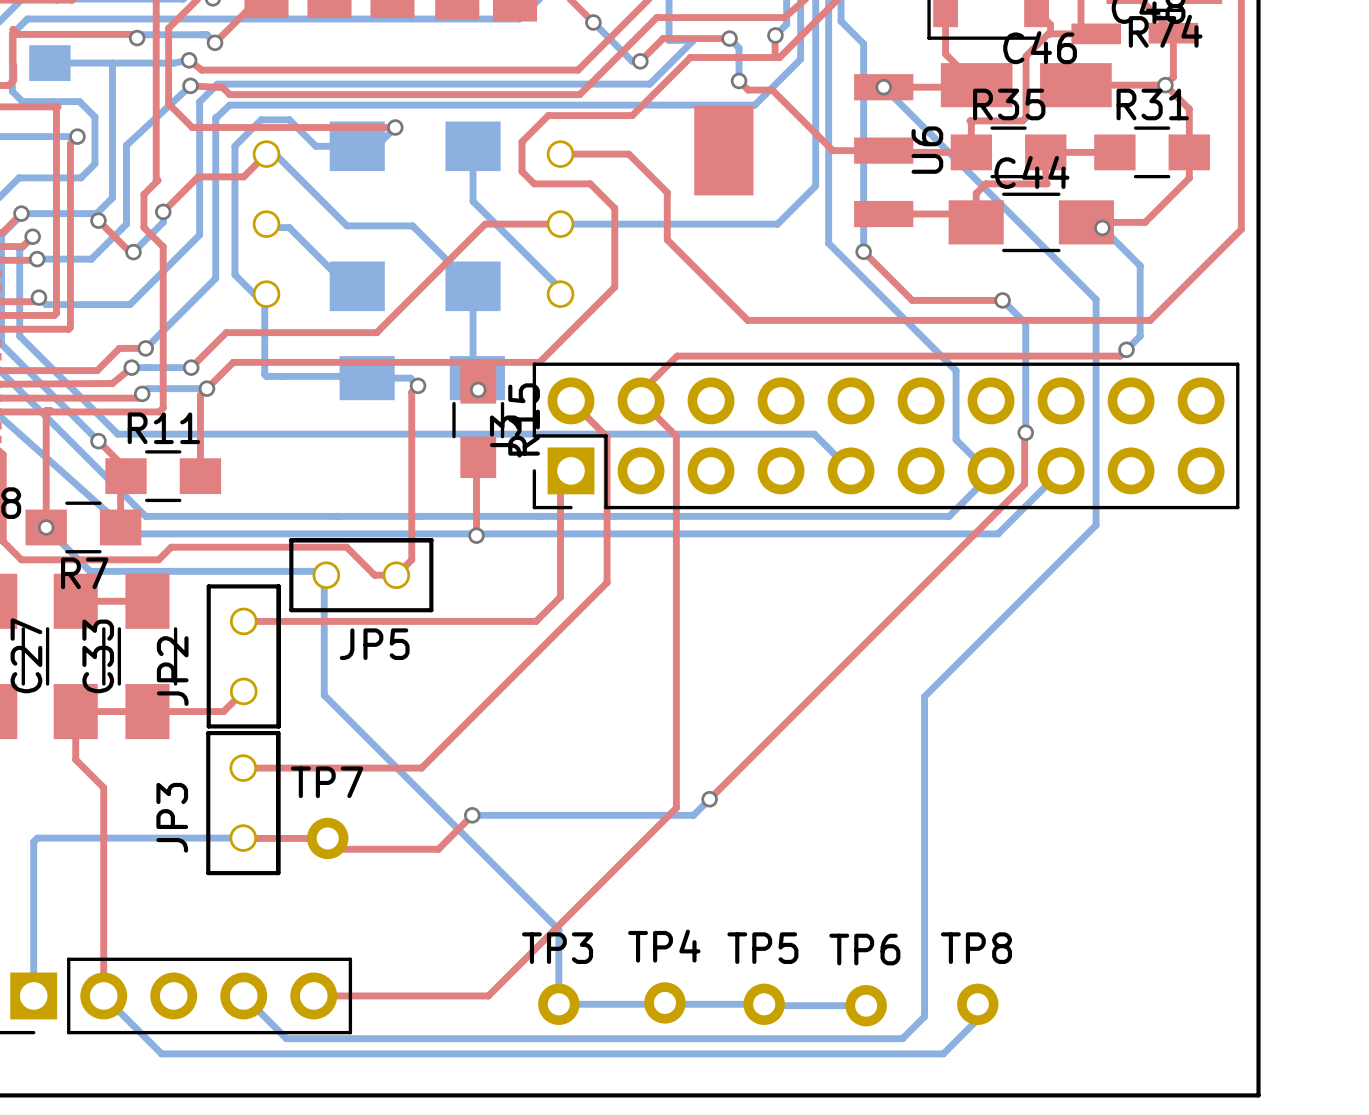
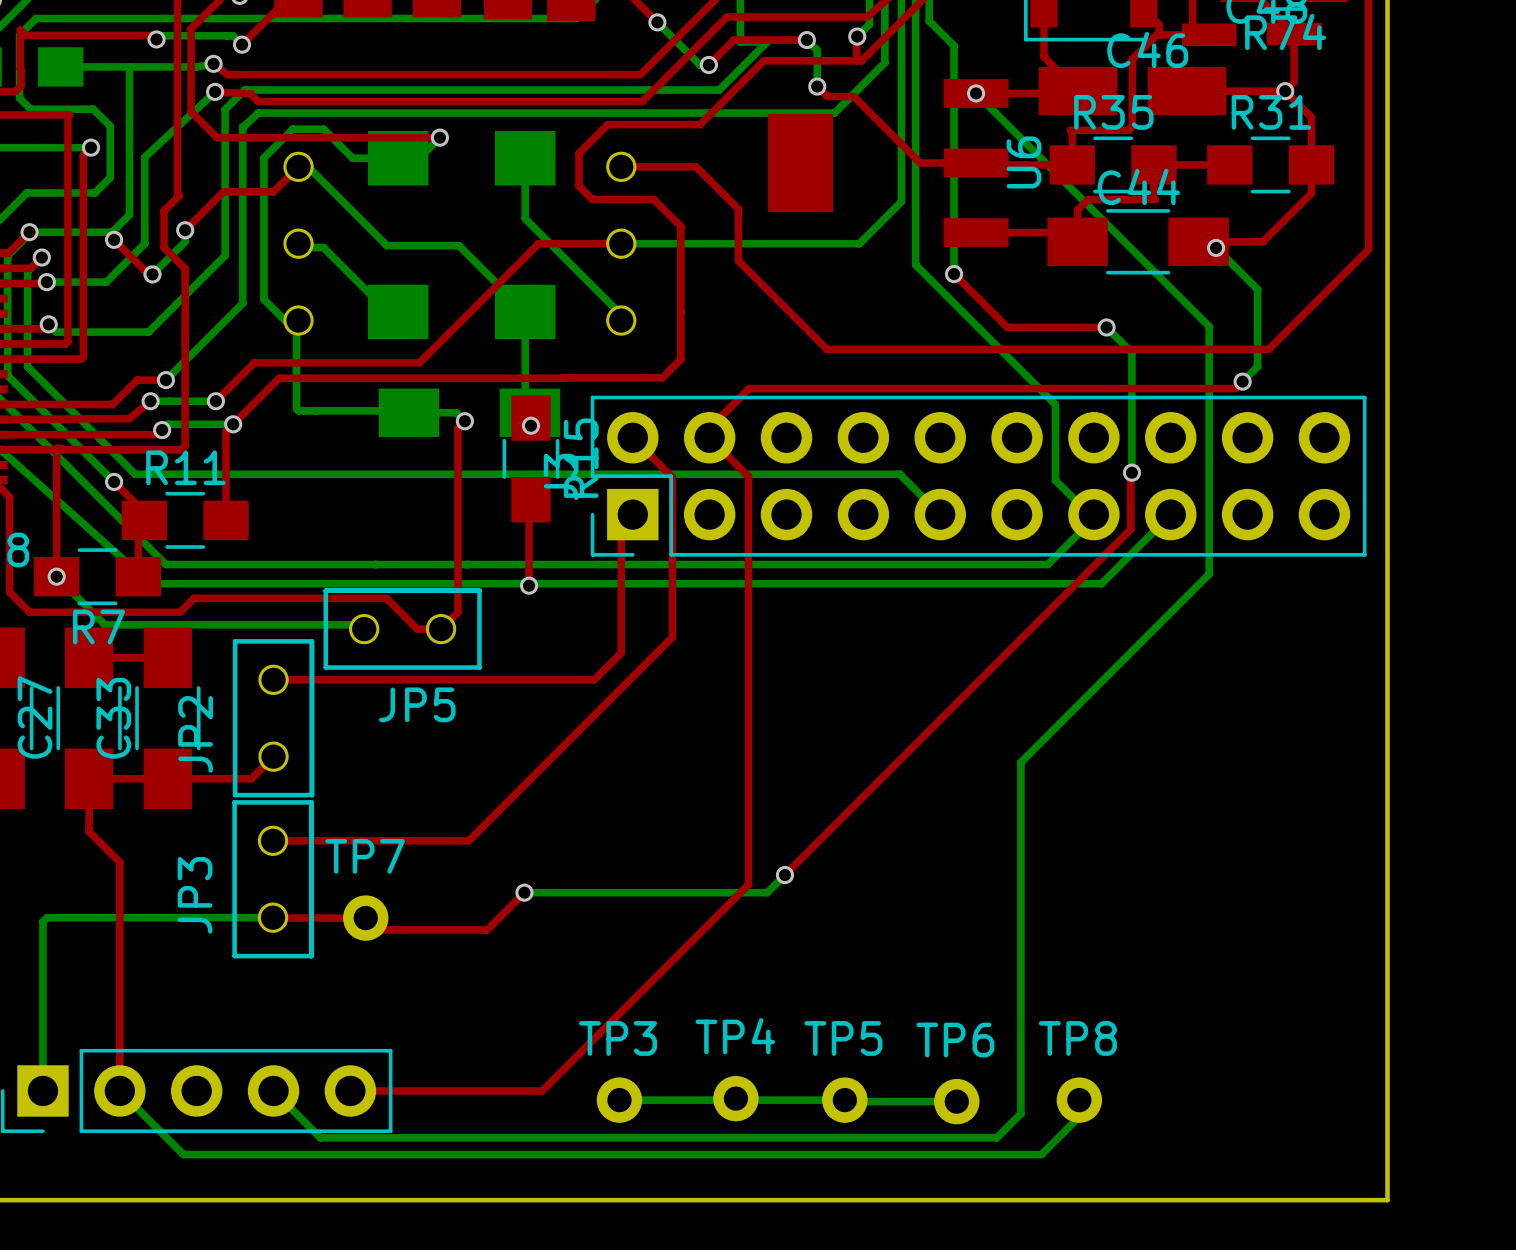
top track: (614, 287) (539, 362) (233, 362) -> (567, 378) (279, 378) (262, 395)
top track: none -> (680, 312) (680, 359) (662, 377) (561, 377)
bottom track: (324, 574) (324, 695) (558, 929) (558, 1004) -> none

